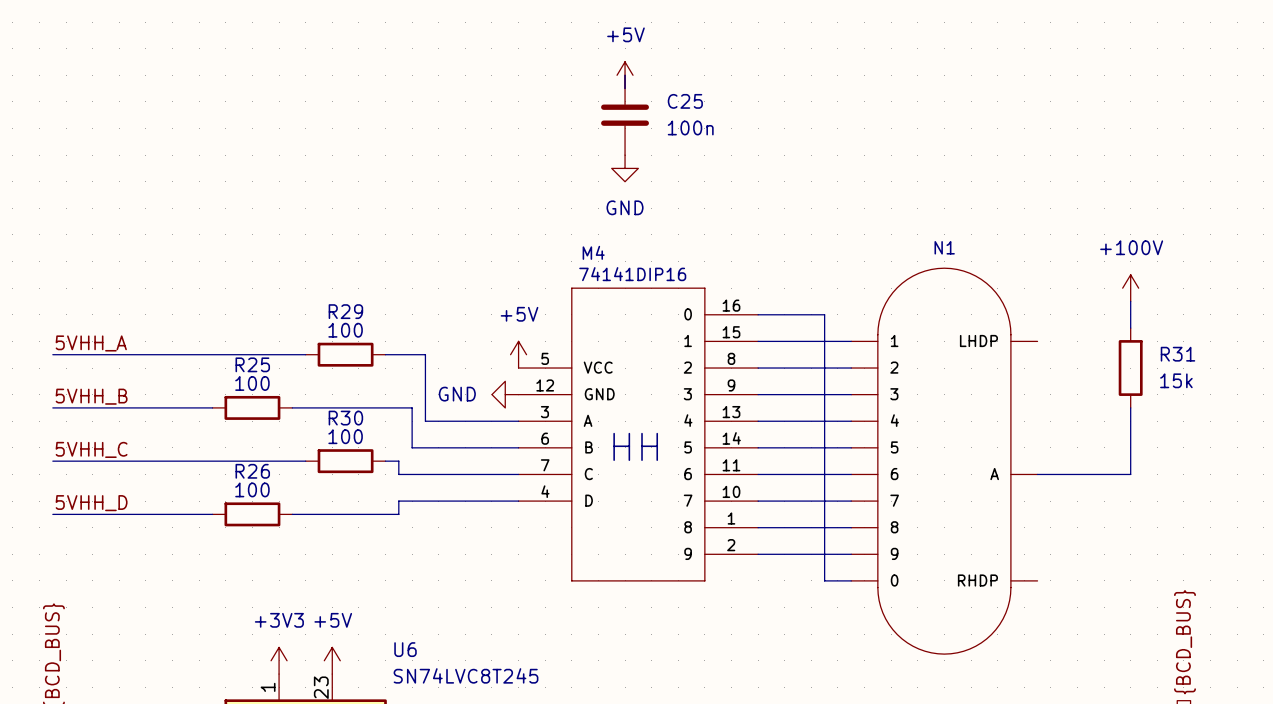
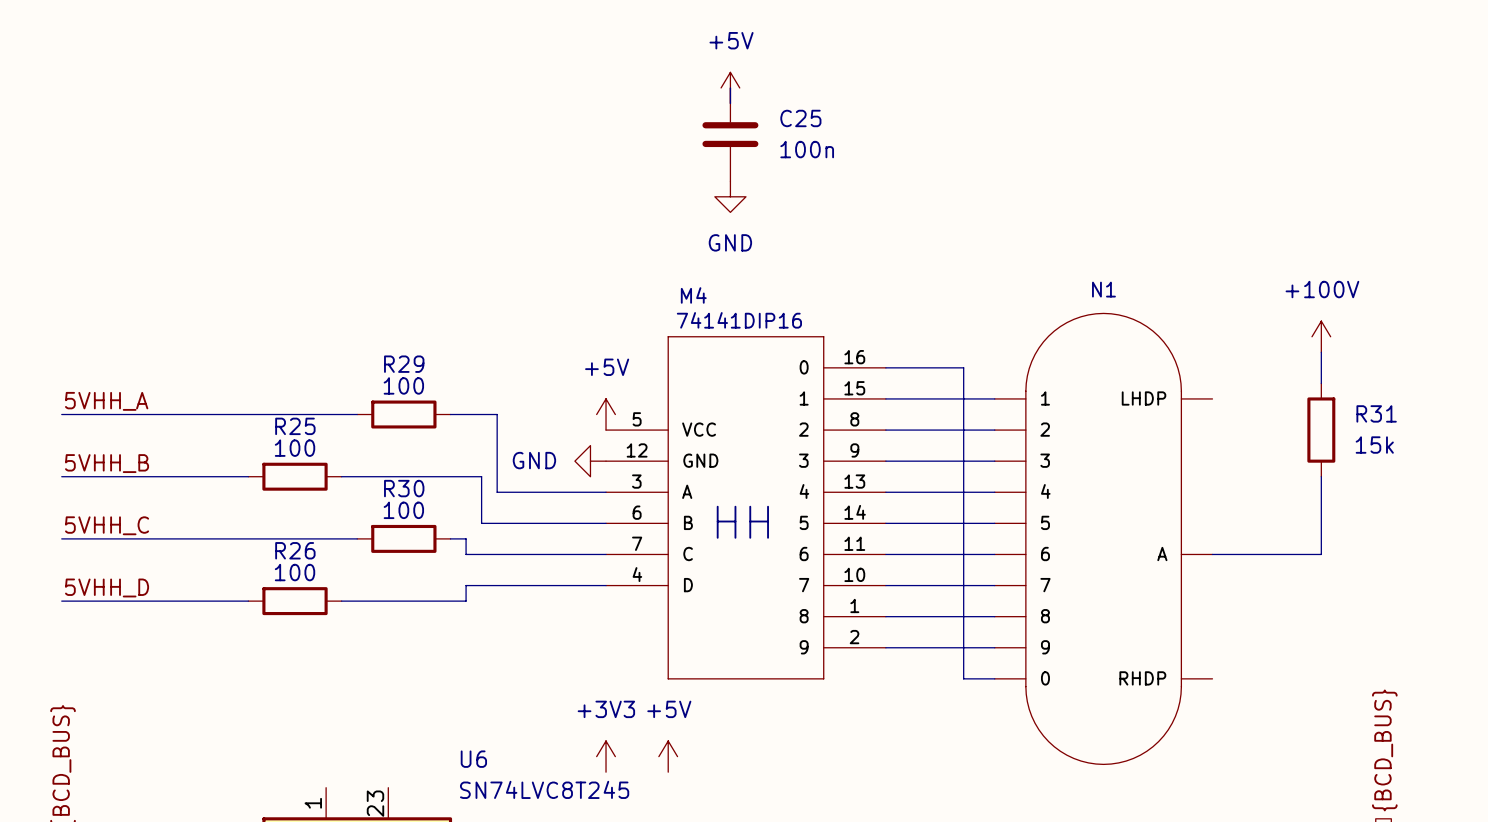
power symbol: none -> +3V3 (606, 756)
power symbol: none -> +5V (668, 756)
power symbol: +3V3 (279, 660) -> none
power symbol: +5V (332, 660) -> none

